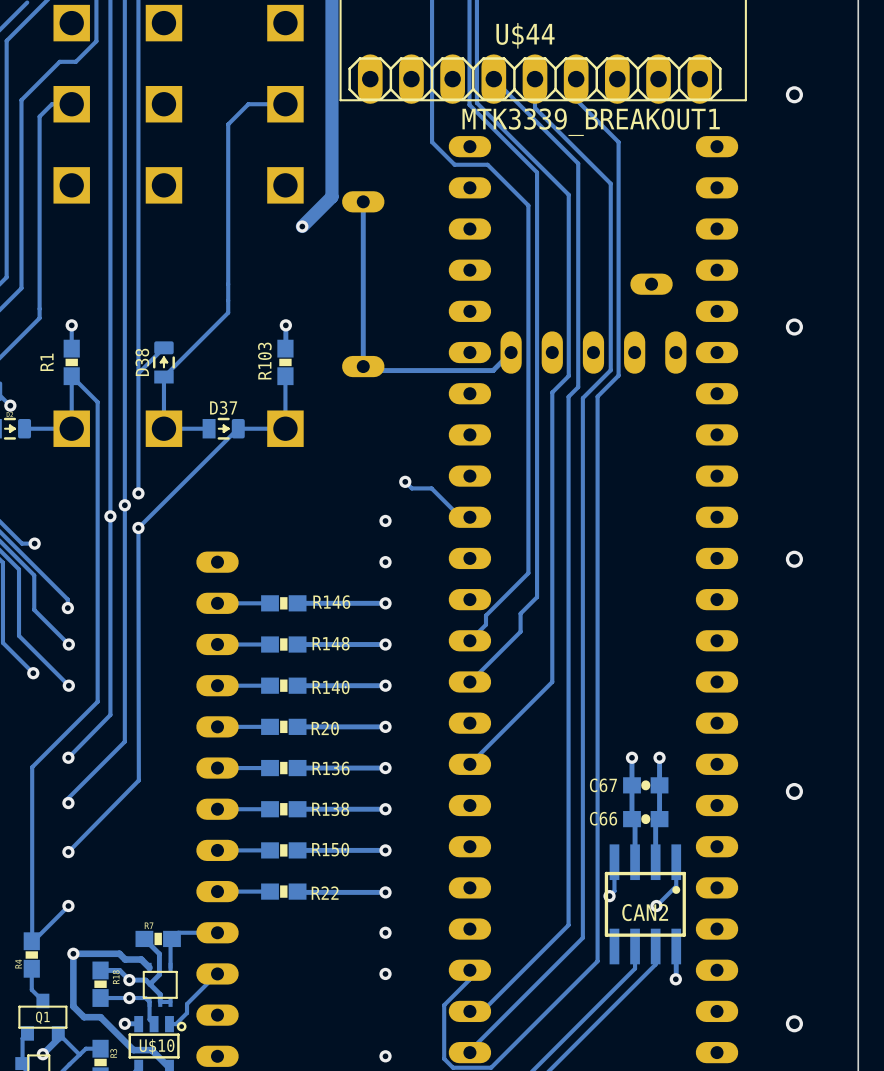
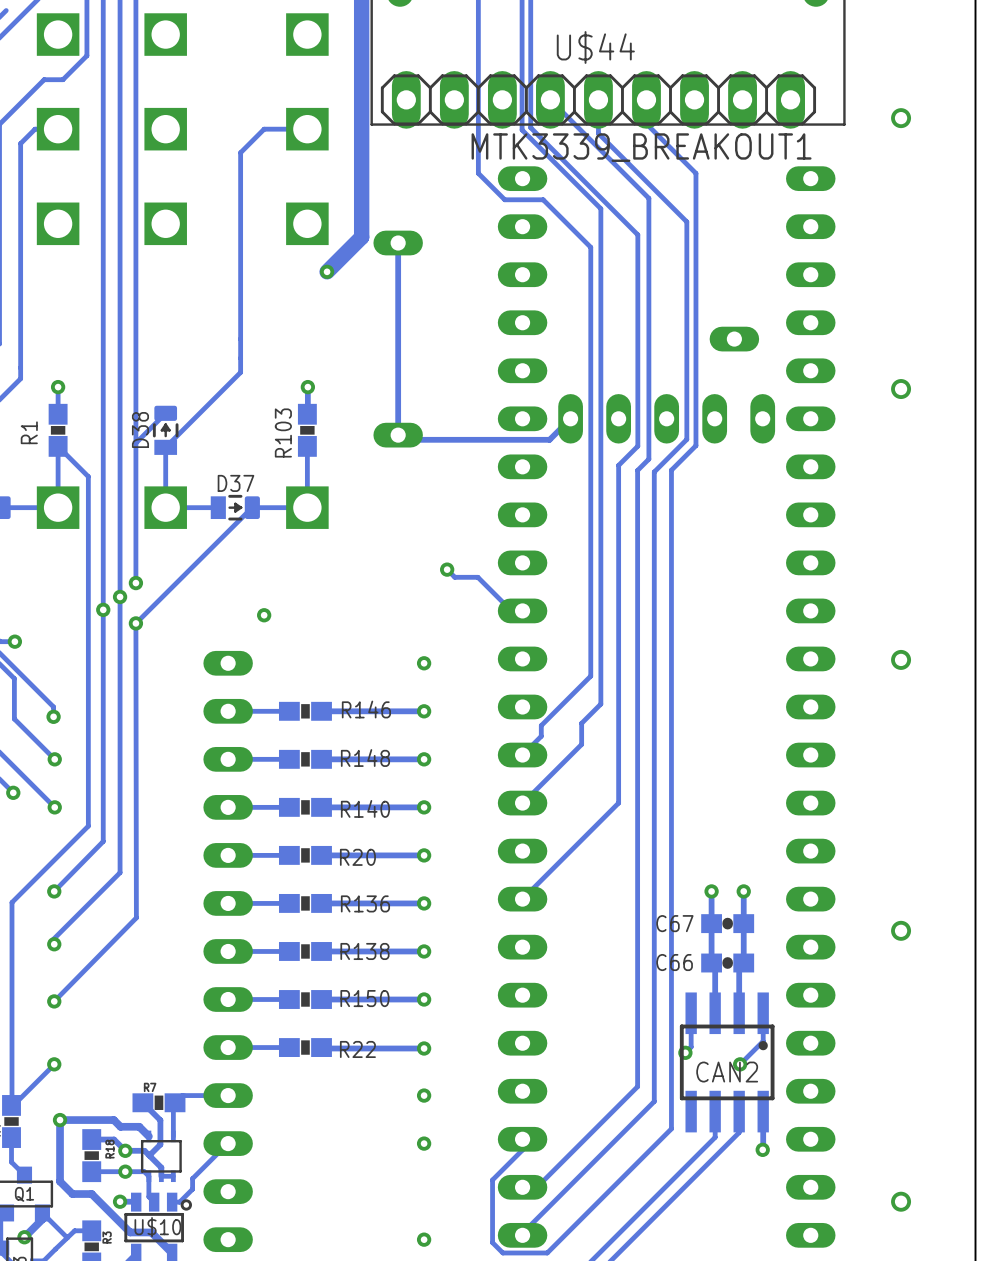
via: none -> (264, 615)
via: (385, 520) -> none

